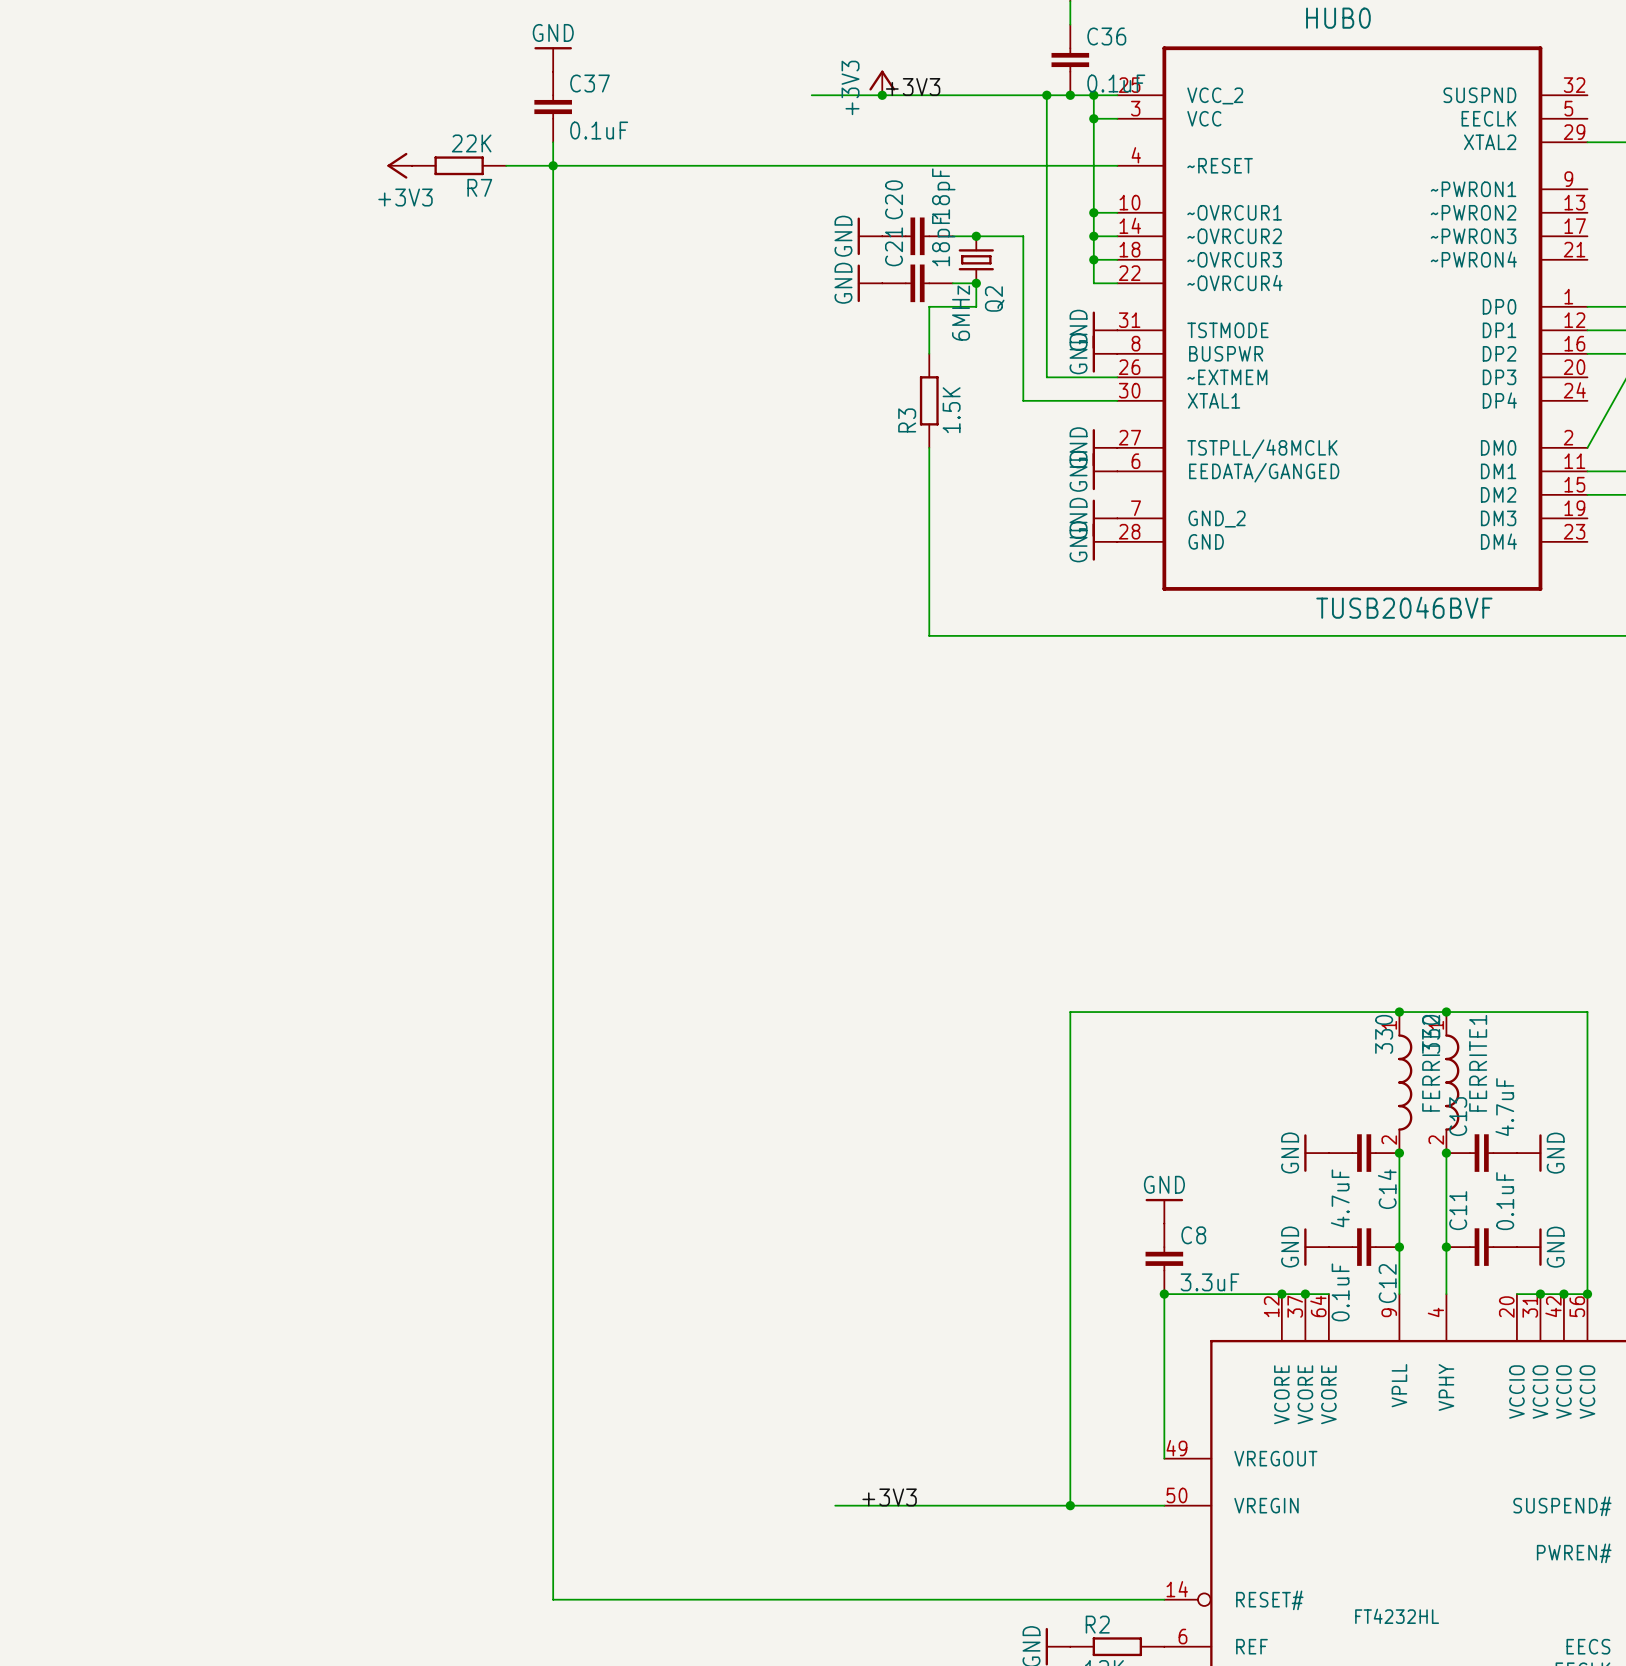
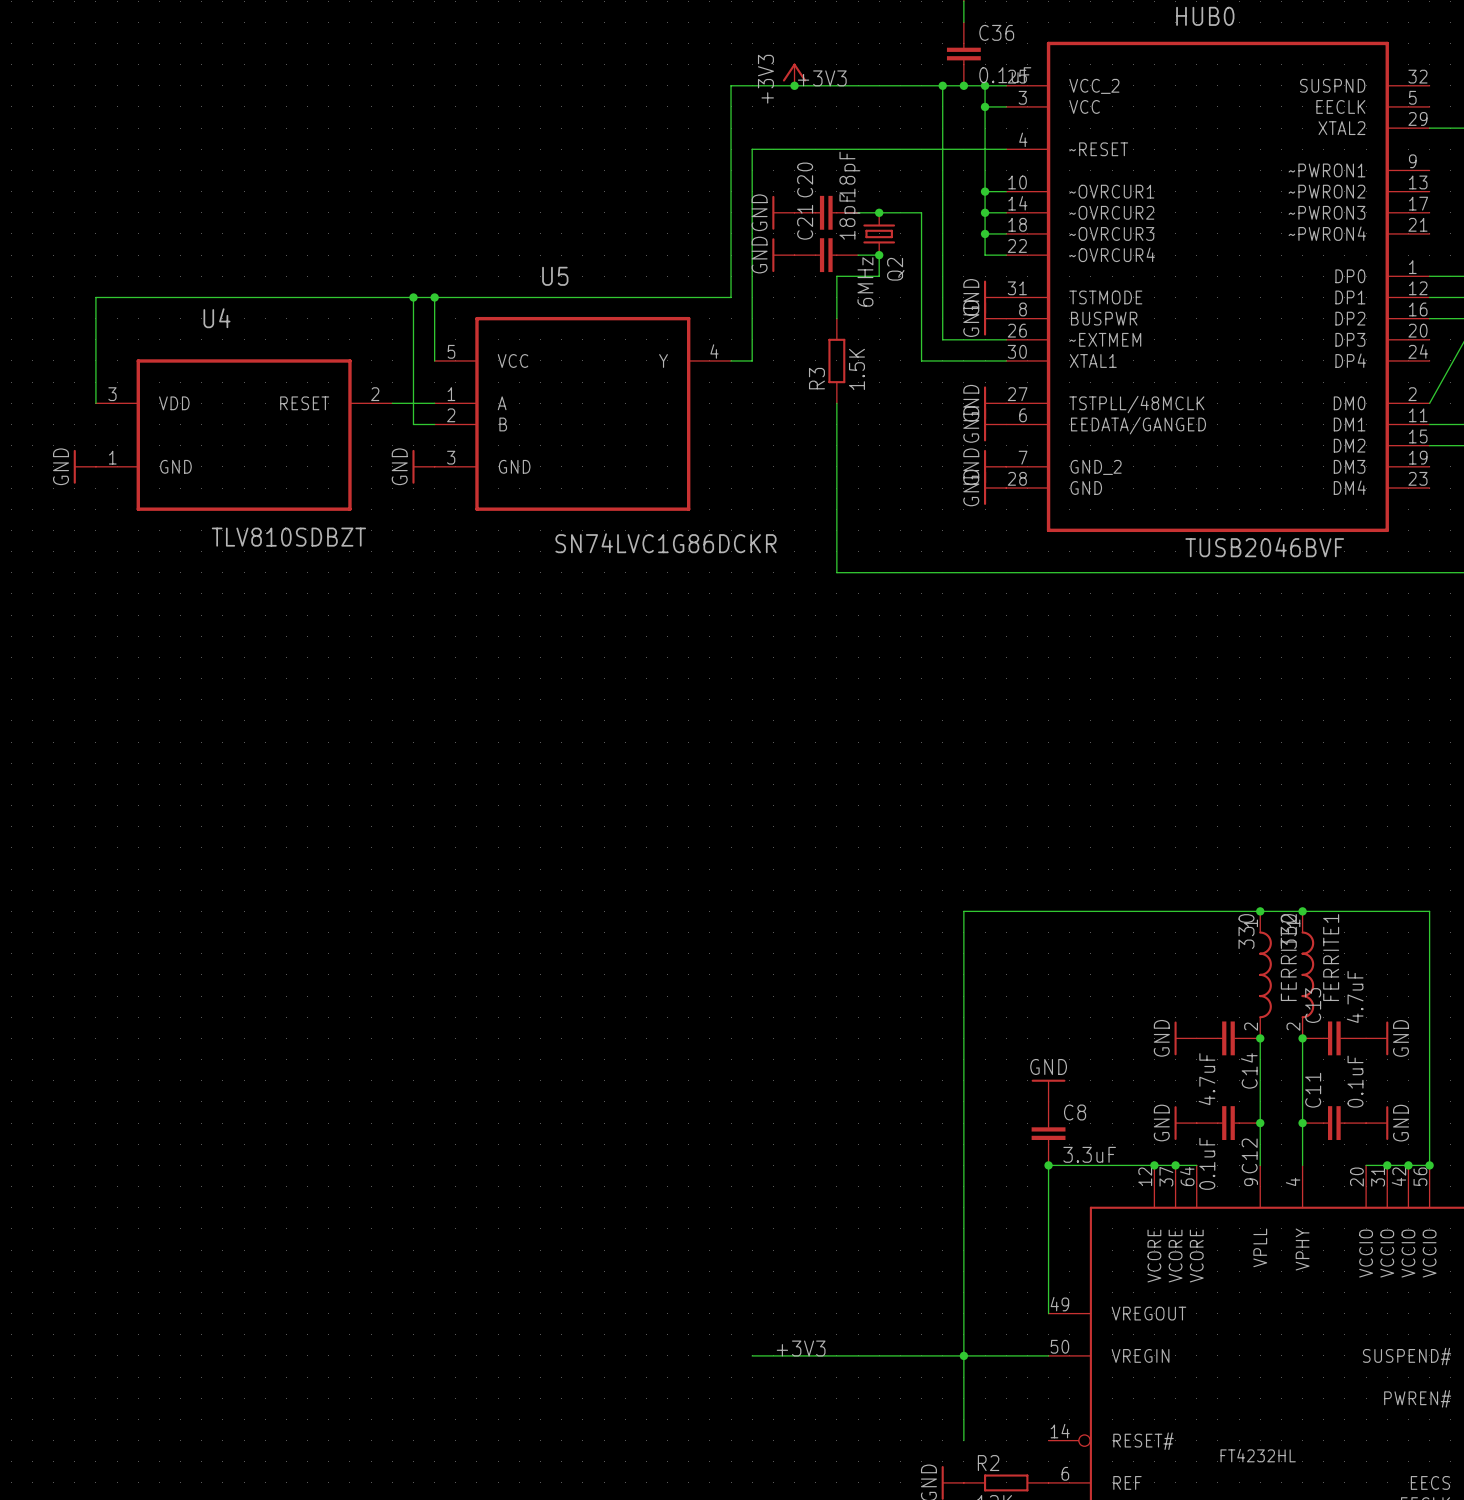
power symbol: GND (553, 59) -> none
wire: none -> (731, 85) (731, 297) (95, 297) (95, 403)
C37: 0.1uF (553, 107) -> none
wire: (553, 142) (553, 1599) (1164, 1599) -> none
power symbol: +3V3 (399, 165) -> none
R7: 22K (459, 165) -> none
wire: (506, 165) (835, 165) -> (731, 360) (752, 360) (752, 149)
junction: (553, 165) -> none
wire: none -> (413, 297) (413, 424) (434, 424)
junction: none -> (413, 297)
wire: none -> (434, 297) (434, 360)
junction: none -> (434, 297)
wire: none -> (392, 403) (434, 403)
U5: none -> SN74LVC1G86DCKR (582, 413)
U4: none -> TLV810SDBZT (244, 435)
power symbol: none -> GND (84, 466)
power symbol: none -> GND (423, 466)
wire: none -> (963, 1355) (963, 1440)

